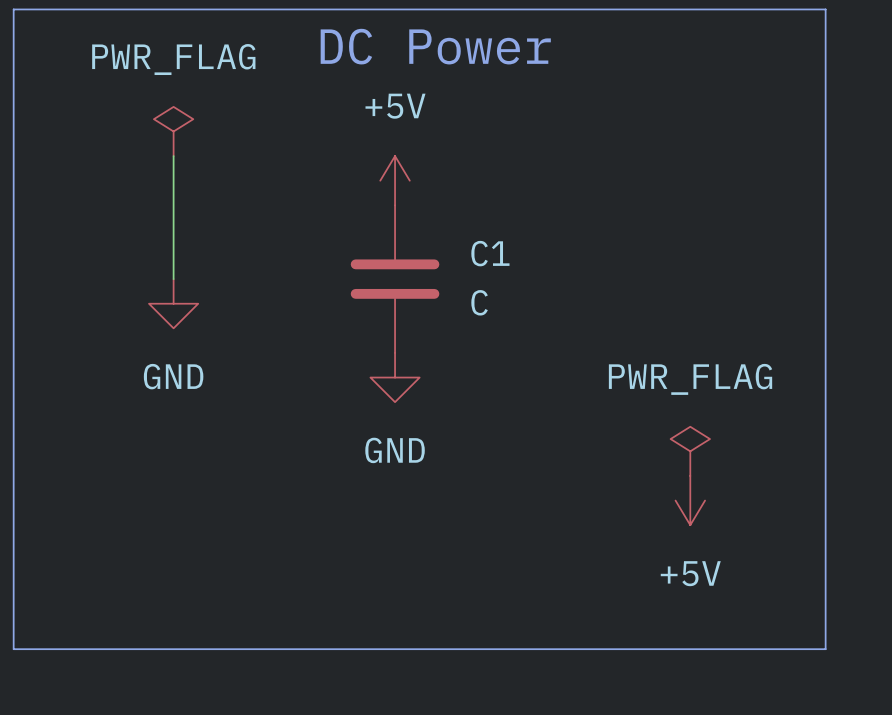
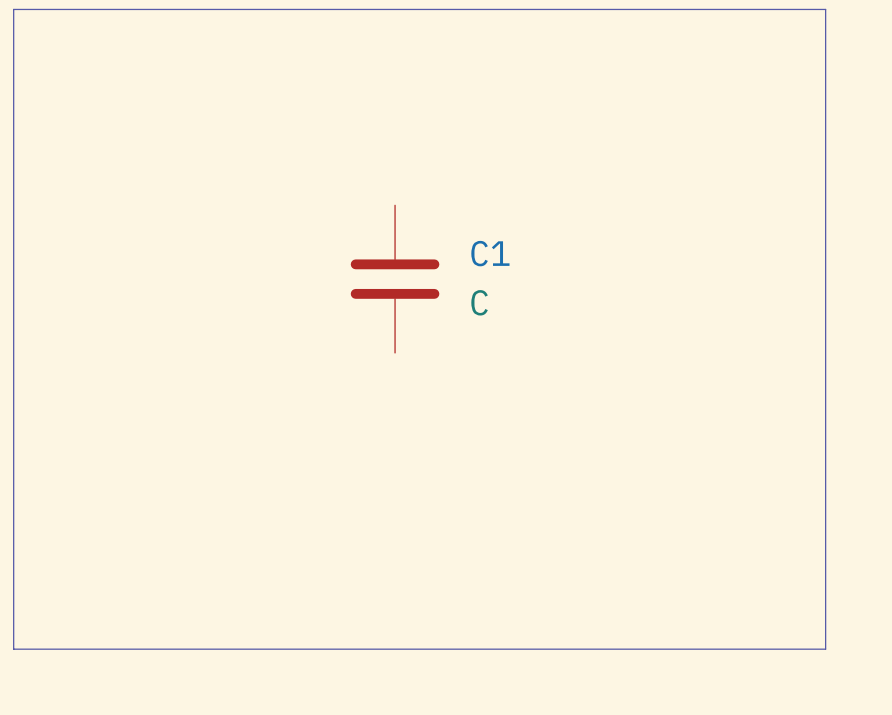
text: DC Power (435, 46) -> none
power symbol: PWR_FLAG (173, 131) -> none
wire: (173, 156) (173, 279) -> none
power symbol: +5V (395, 180) -> none
power symbol: GND (173, 303) -> none
power symbol: GND (395, 377) -> none
power symbol: PWR_FLAG (690, 451) -> none
power symbol: +5V (690, 500) -> none

